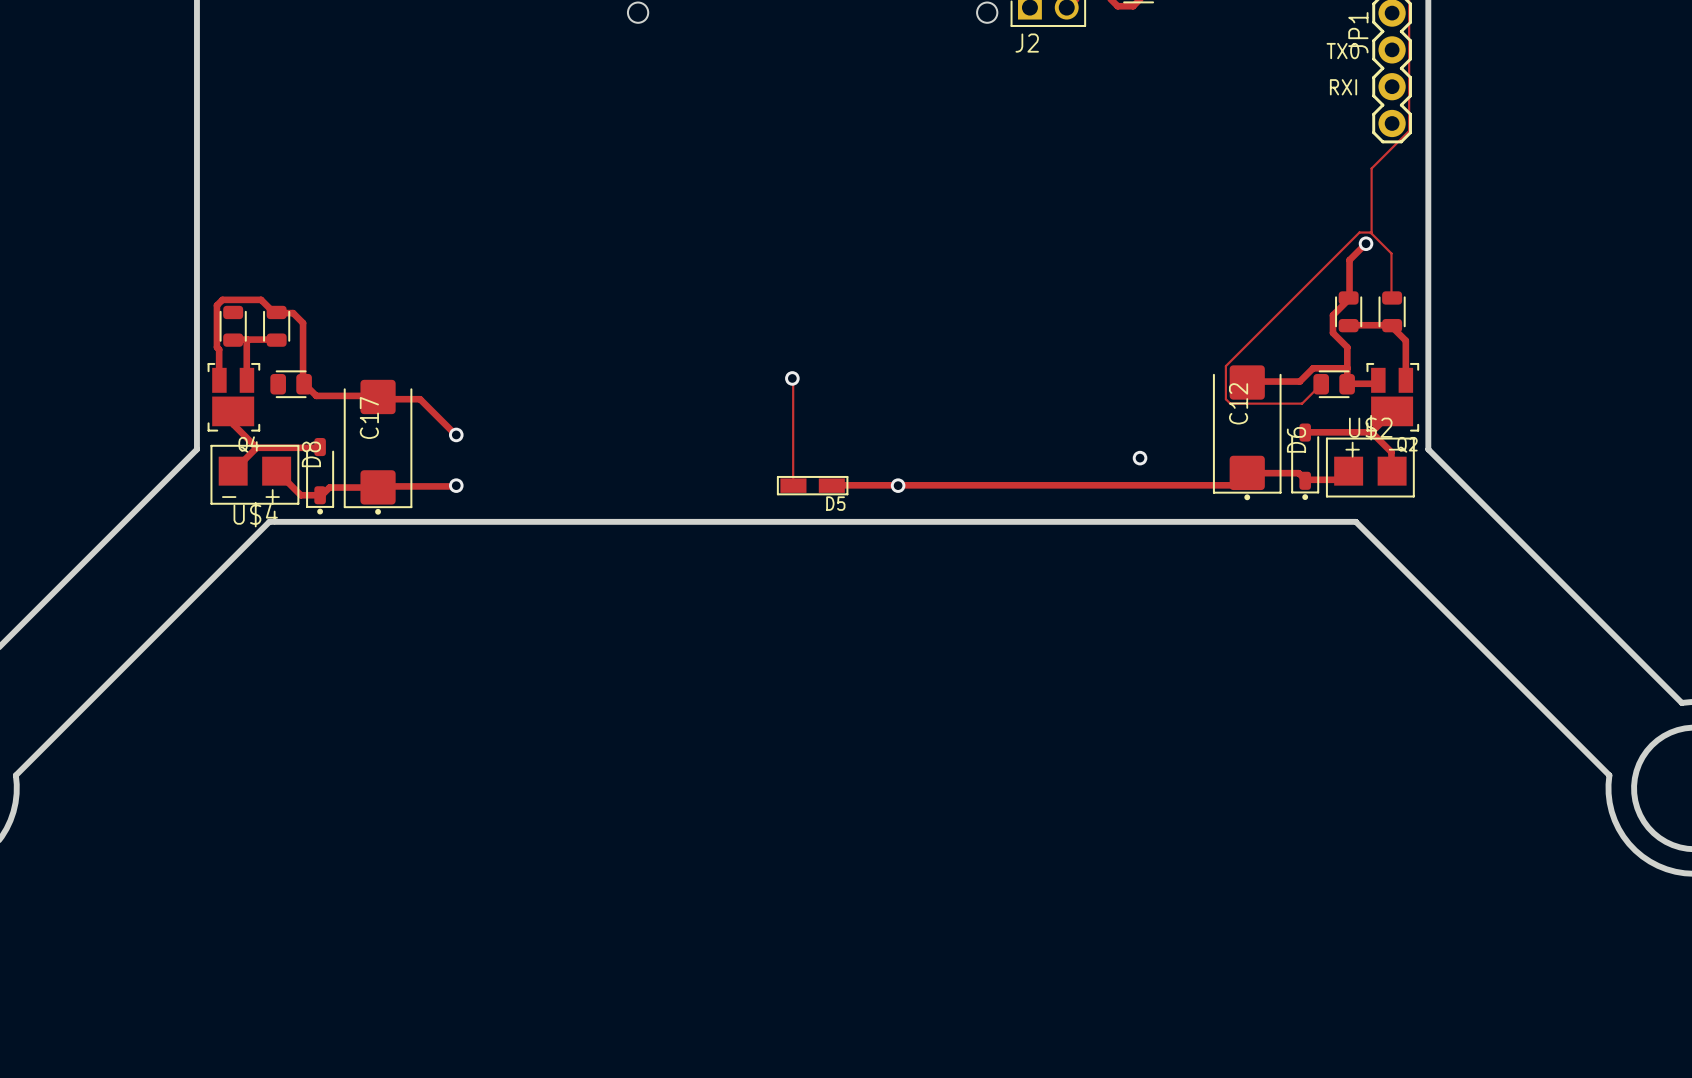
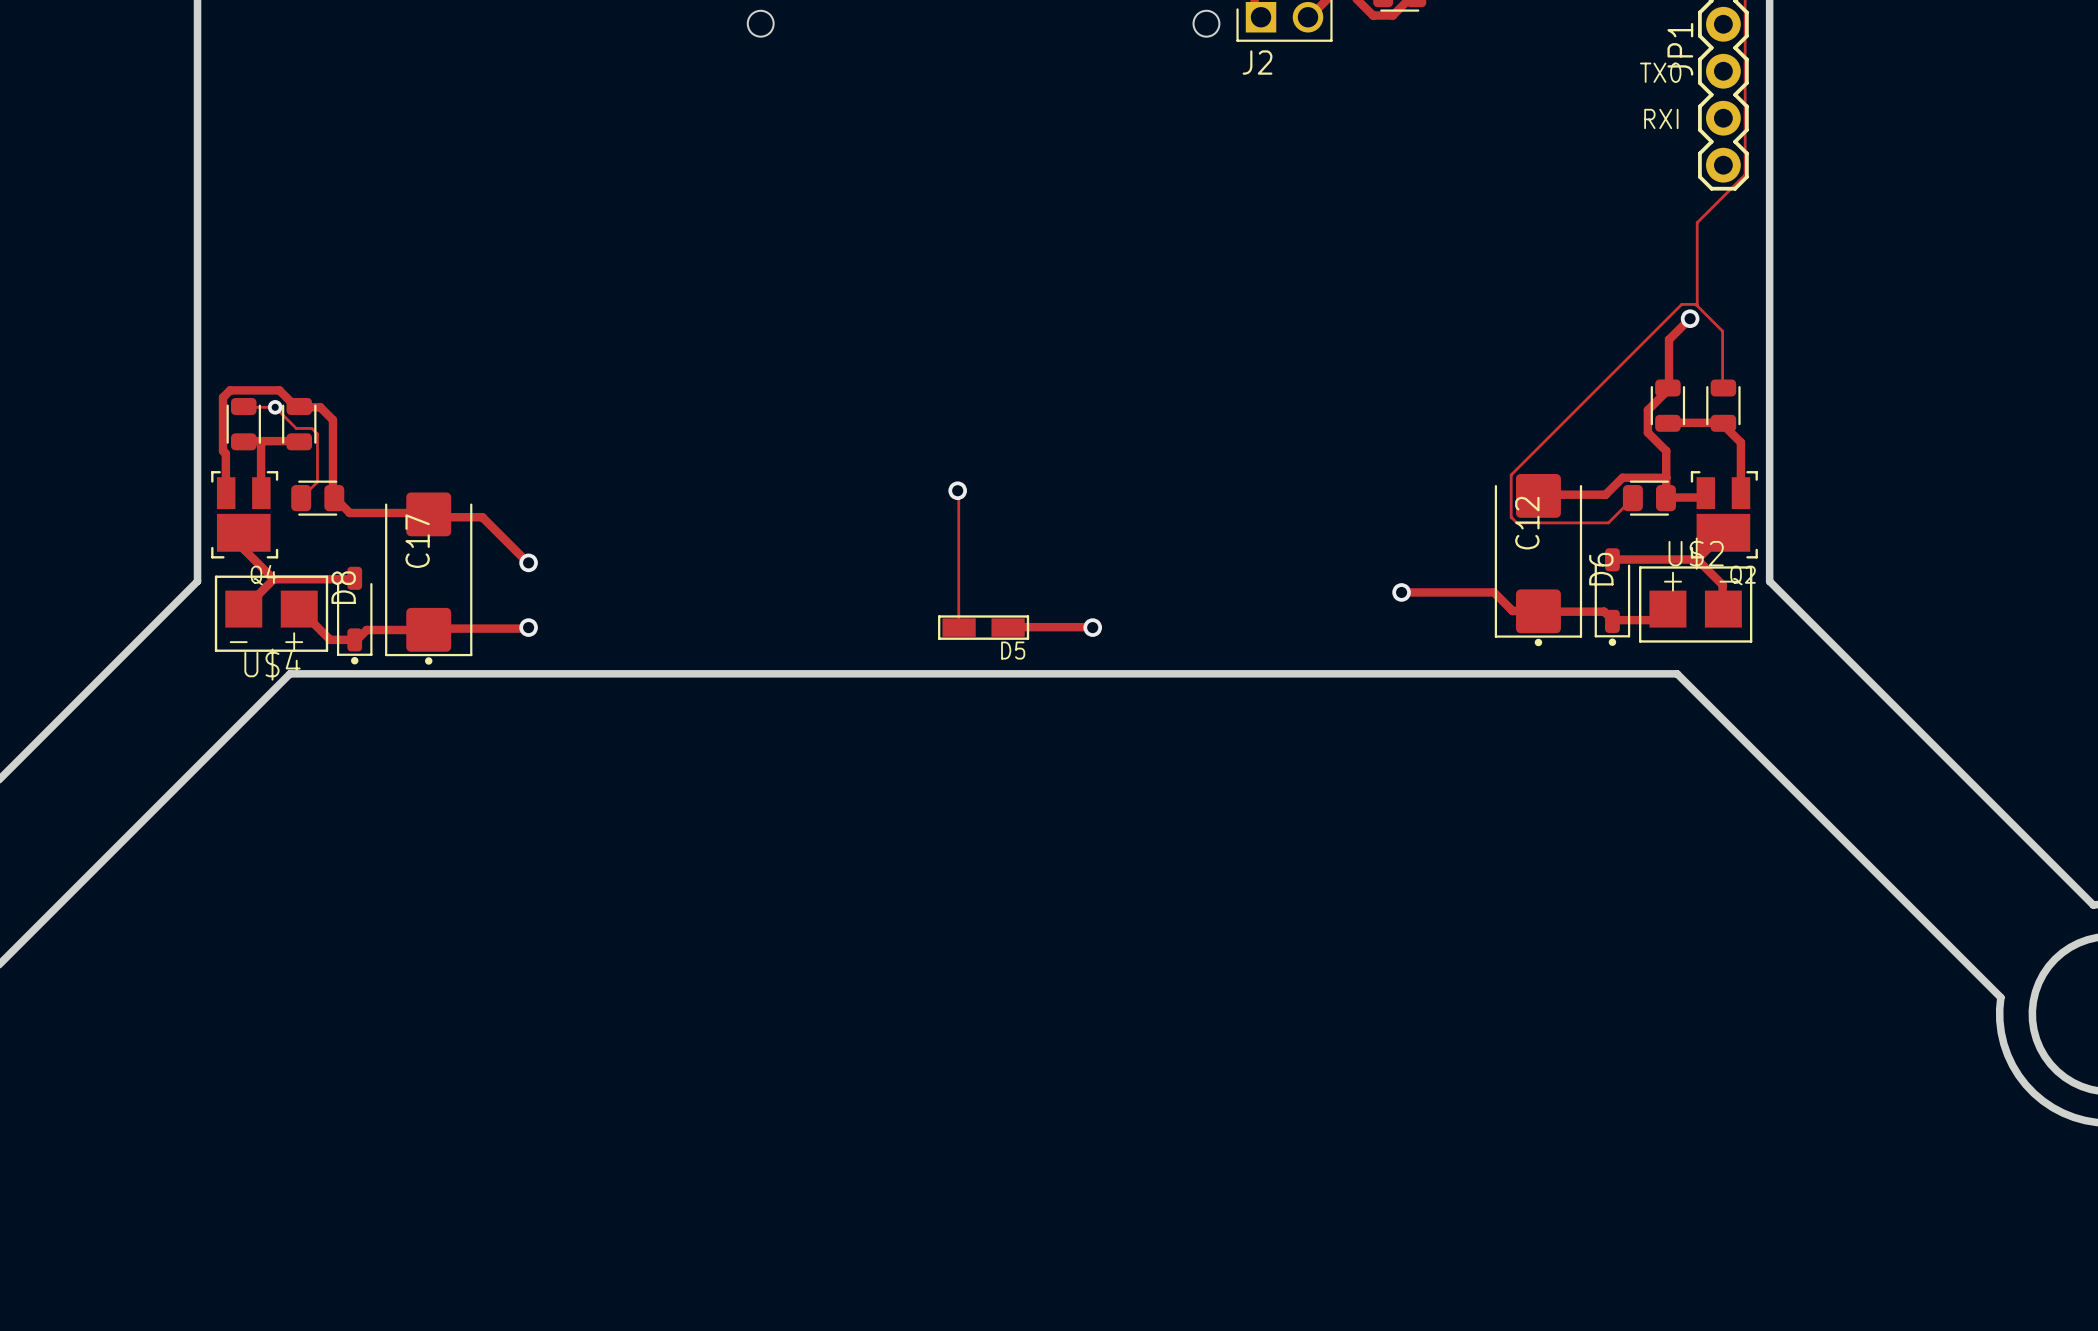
track: none -> (243, 406) (275, 407) (296, 428) (311, 428) (317, 434) (317, 482) (301, 498)
via: none -> (275, 407)
track: none -> (1401, 592) (1494, 592) (1512, 610) (1538, 611)
track: (901, 485) (1233, 485) -> none

